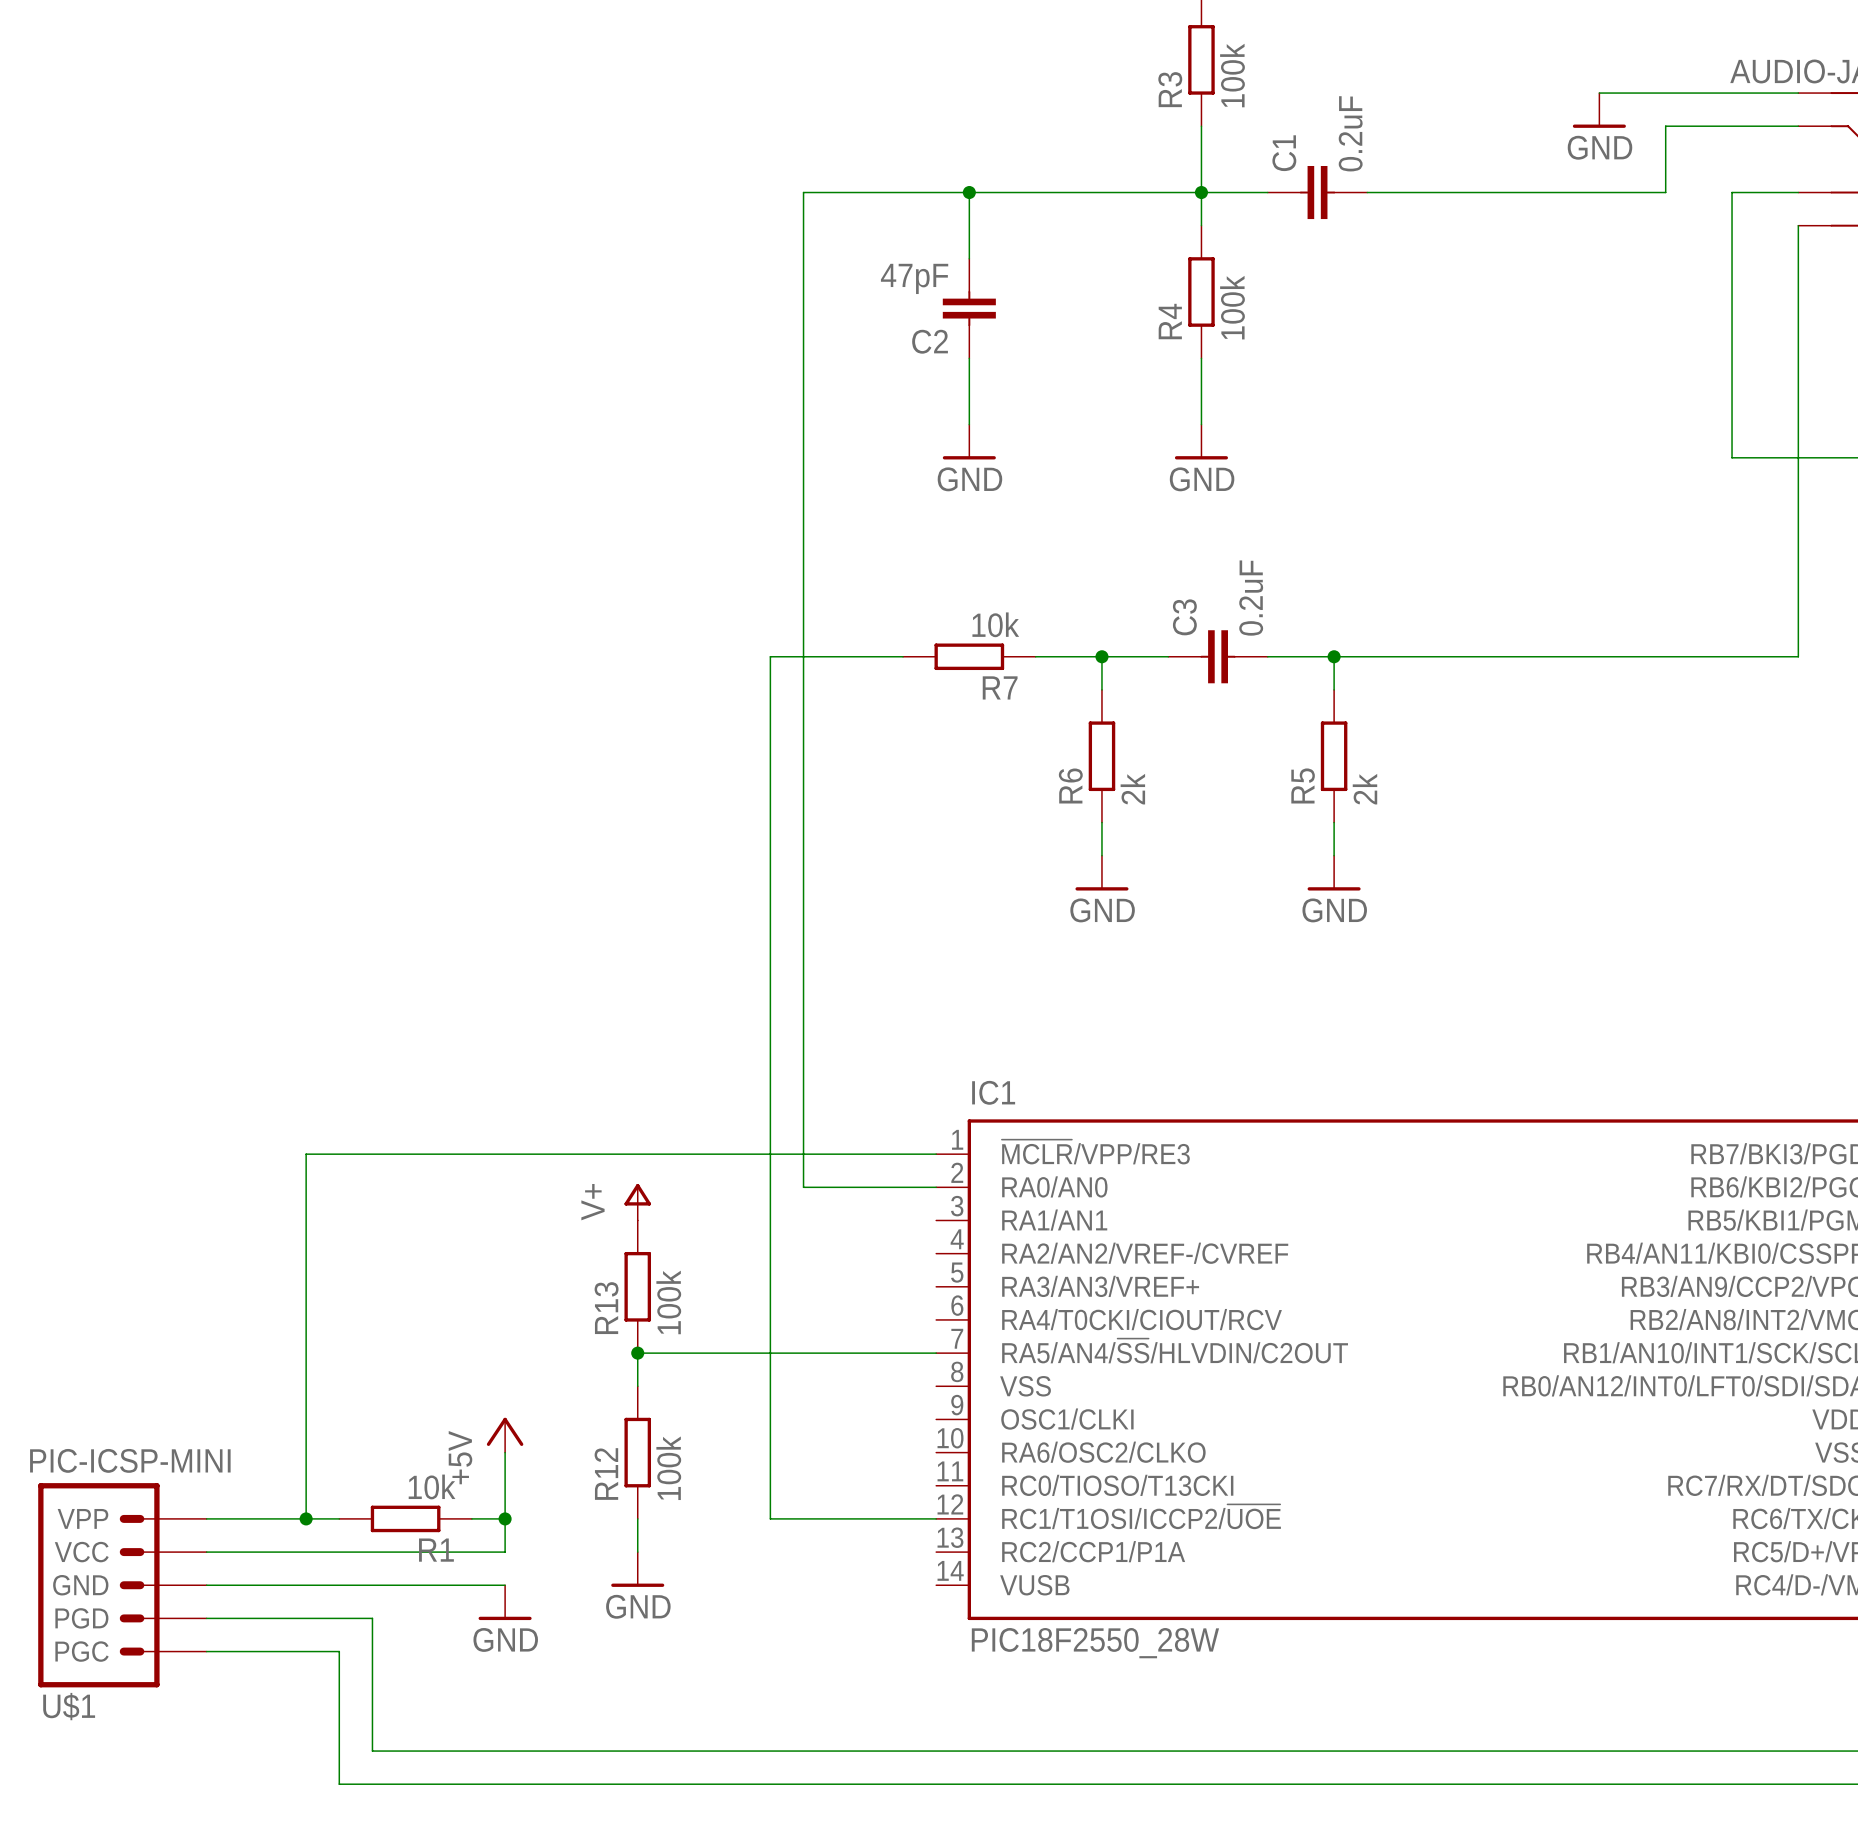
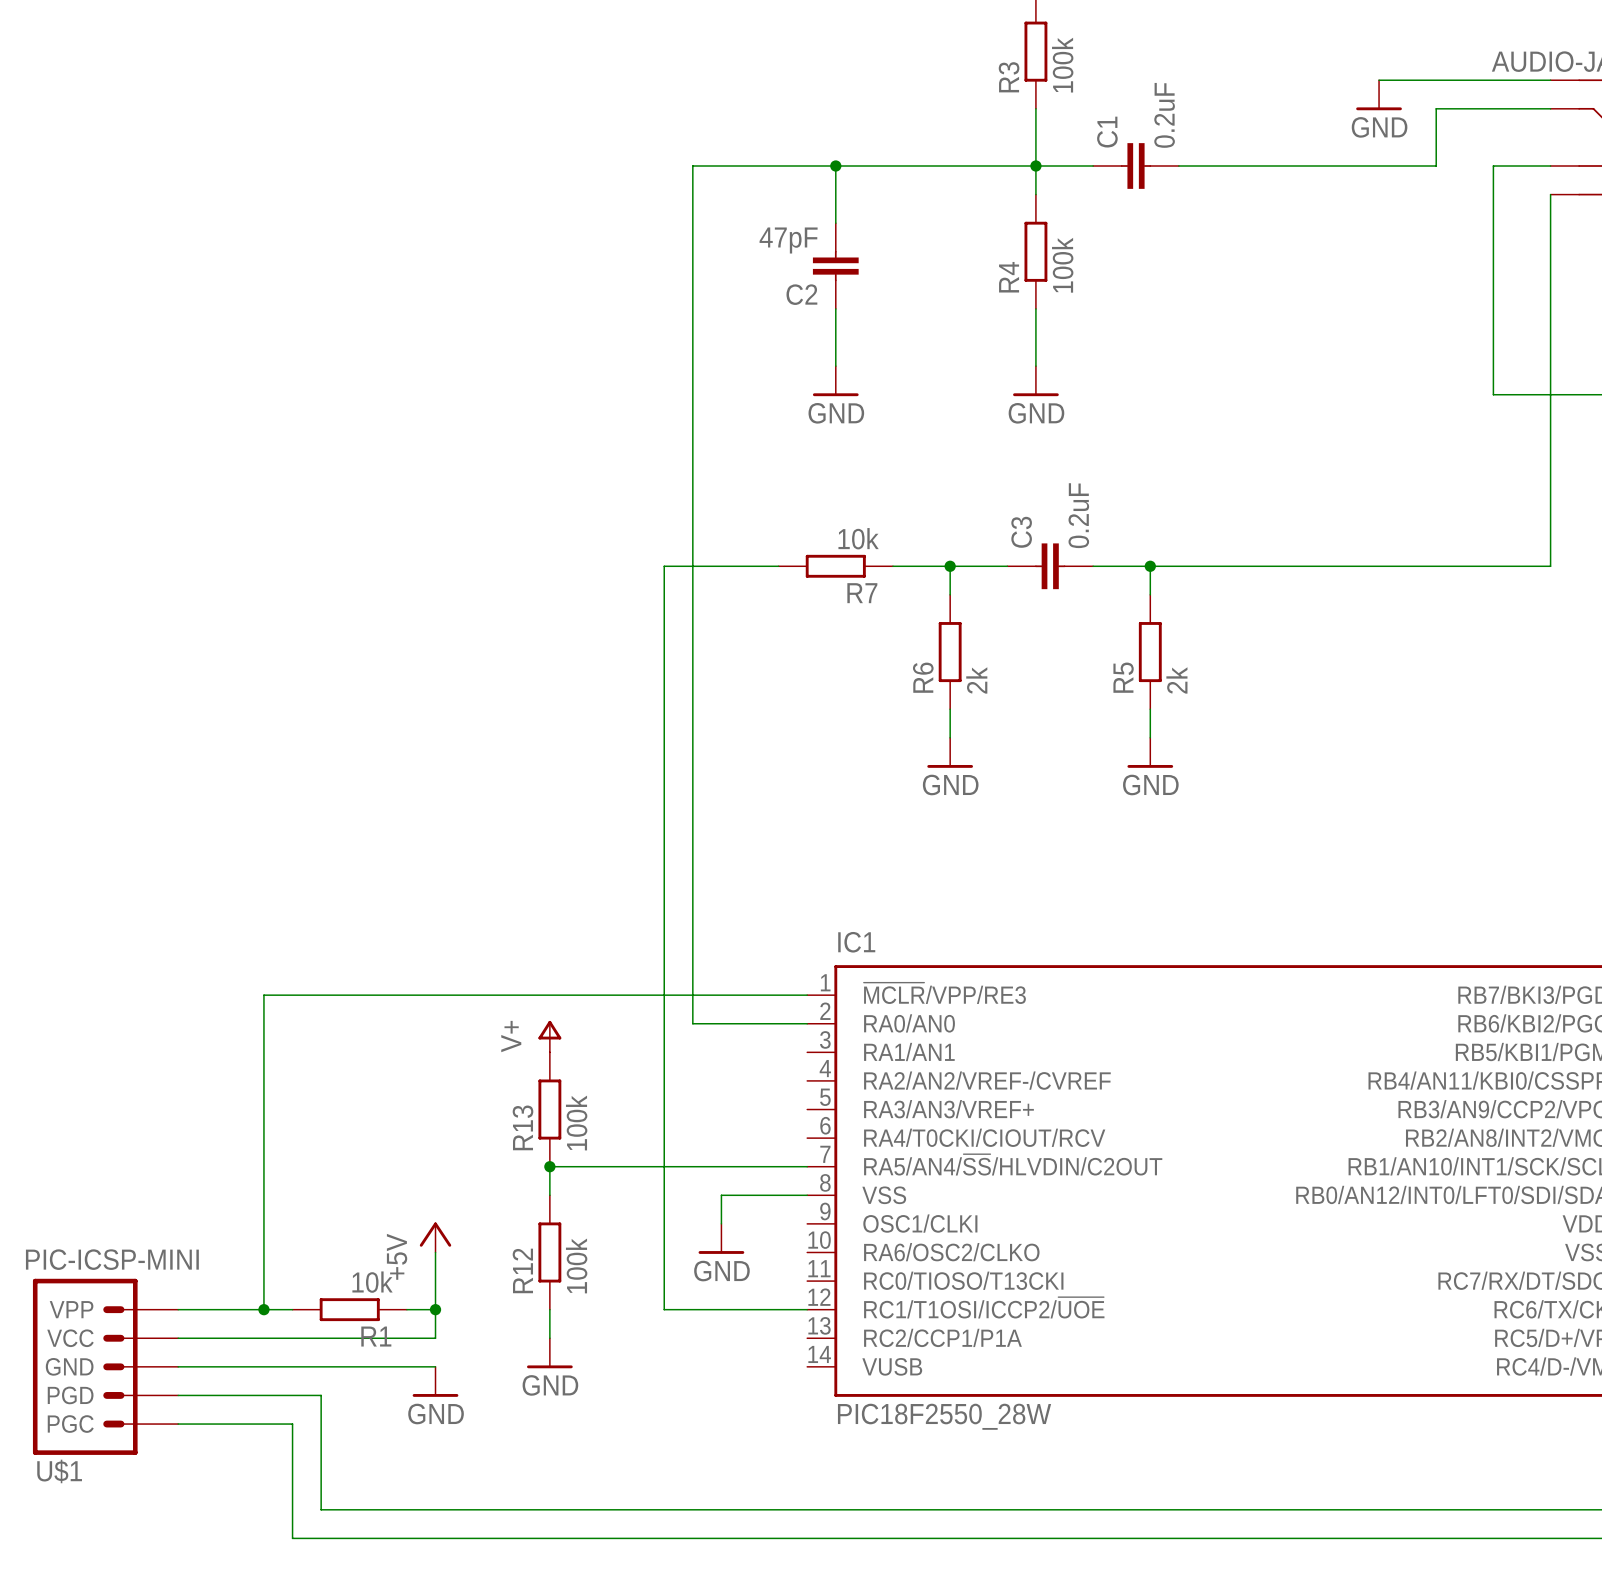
wire: none -> (807, 1195) (721, 1195) (721, 1223)
power symbol: none -> GND (721, 1238)

